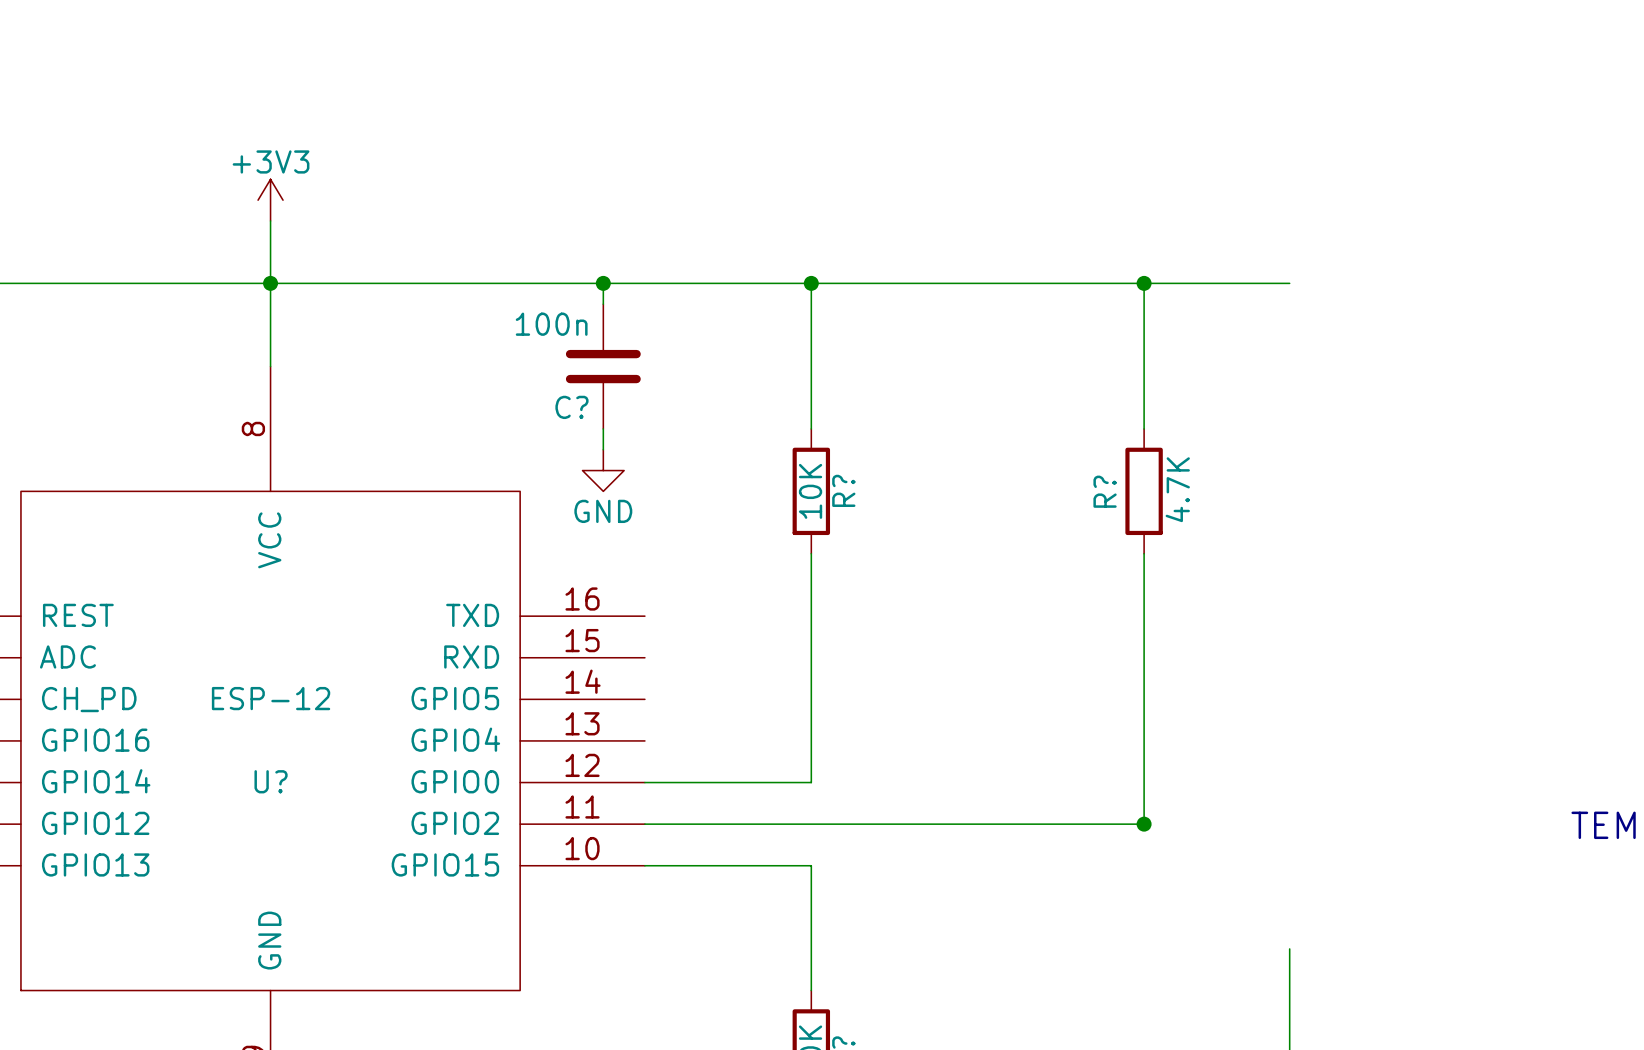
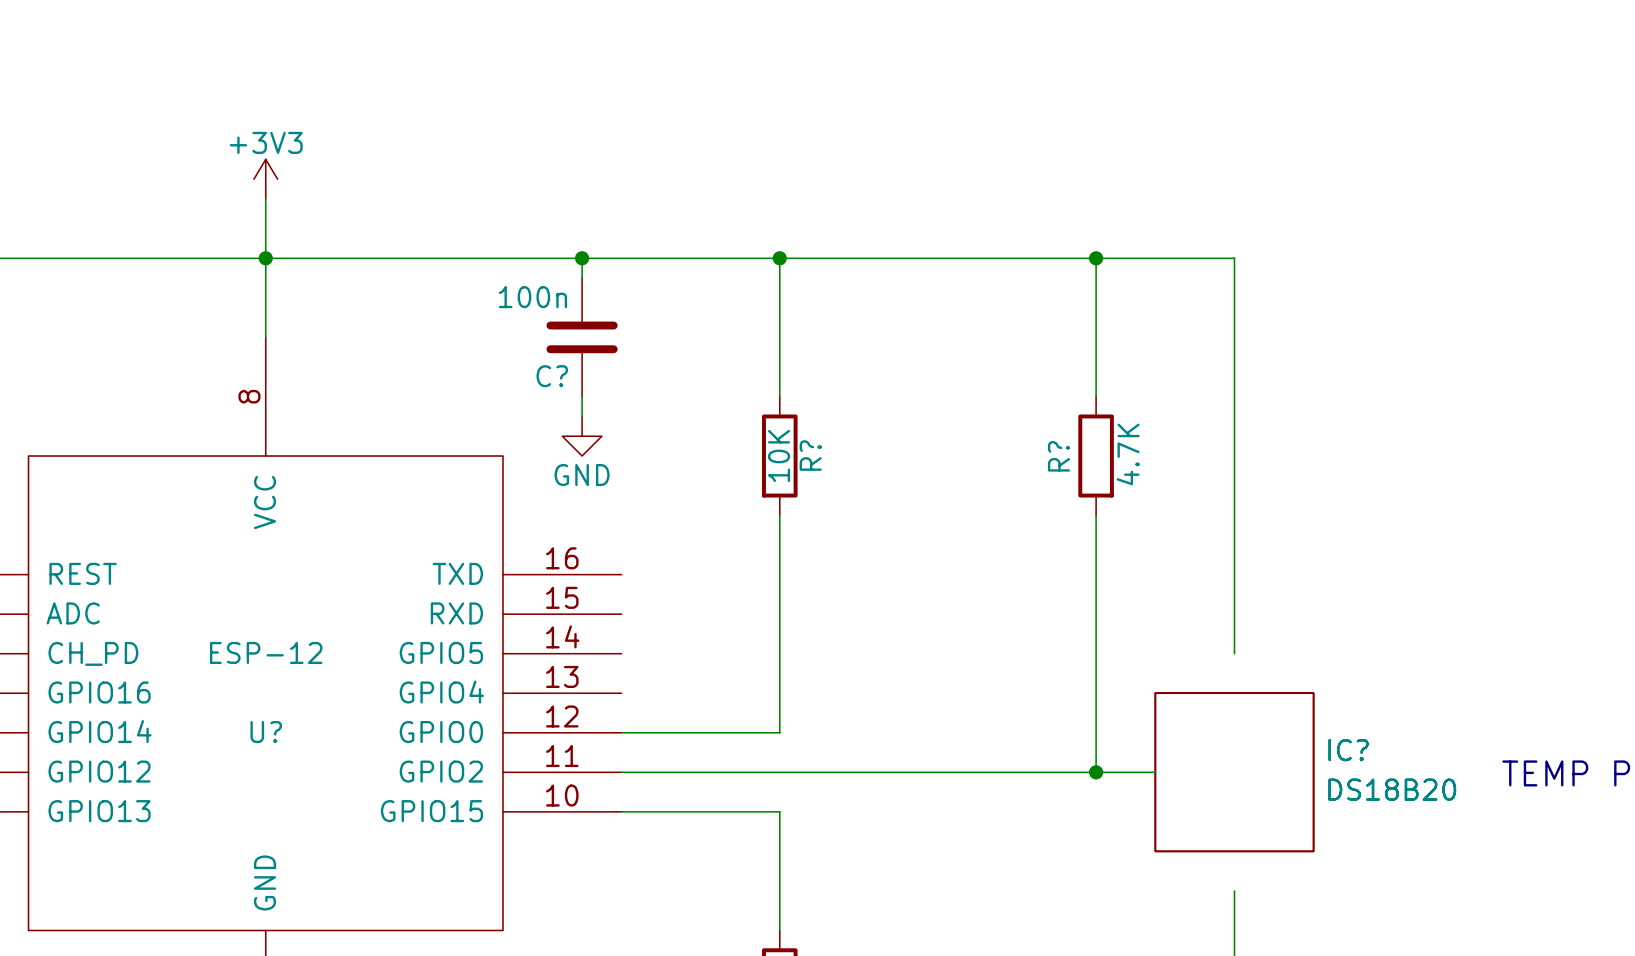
wire: none -> (1234, 258) (1234, 653)
wire: none -> (1096, 772) (1155, 772)
IC?: none -> DS18B20 (1234, 772)

